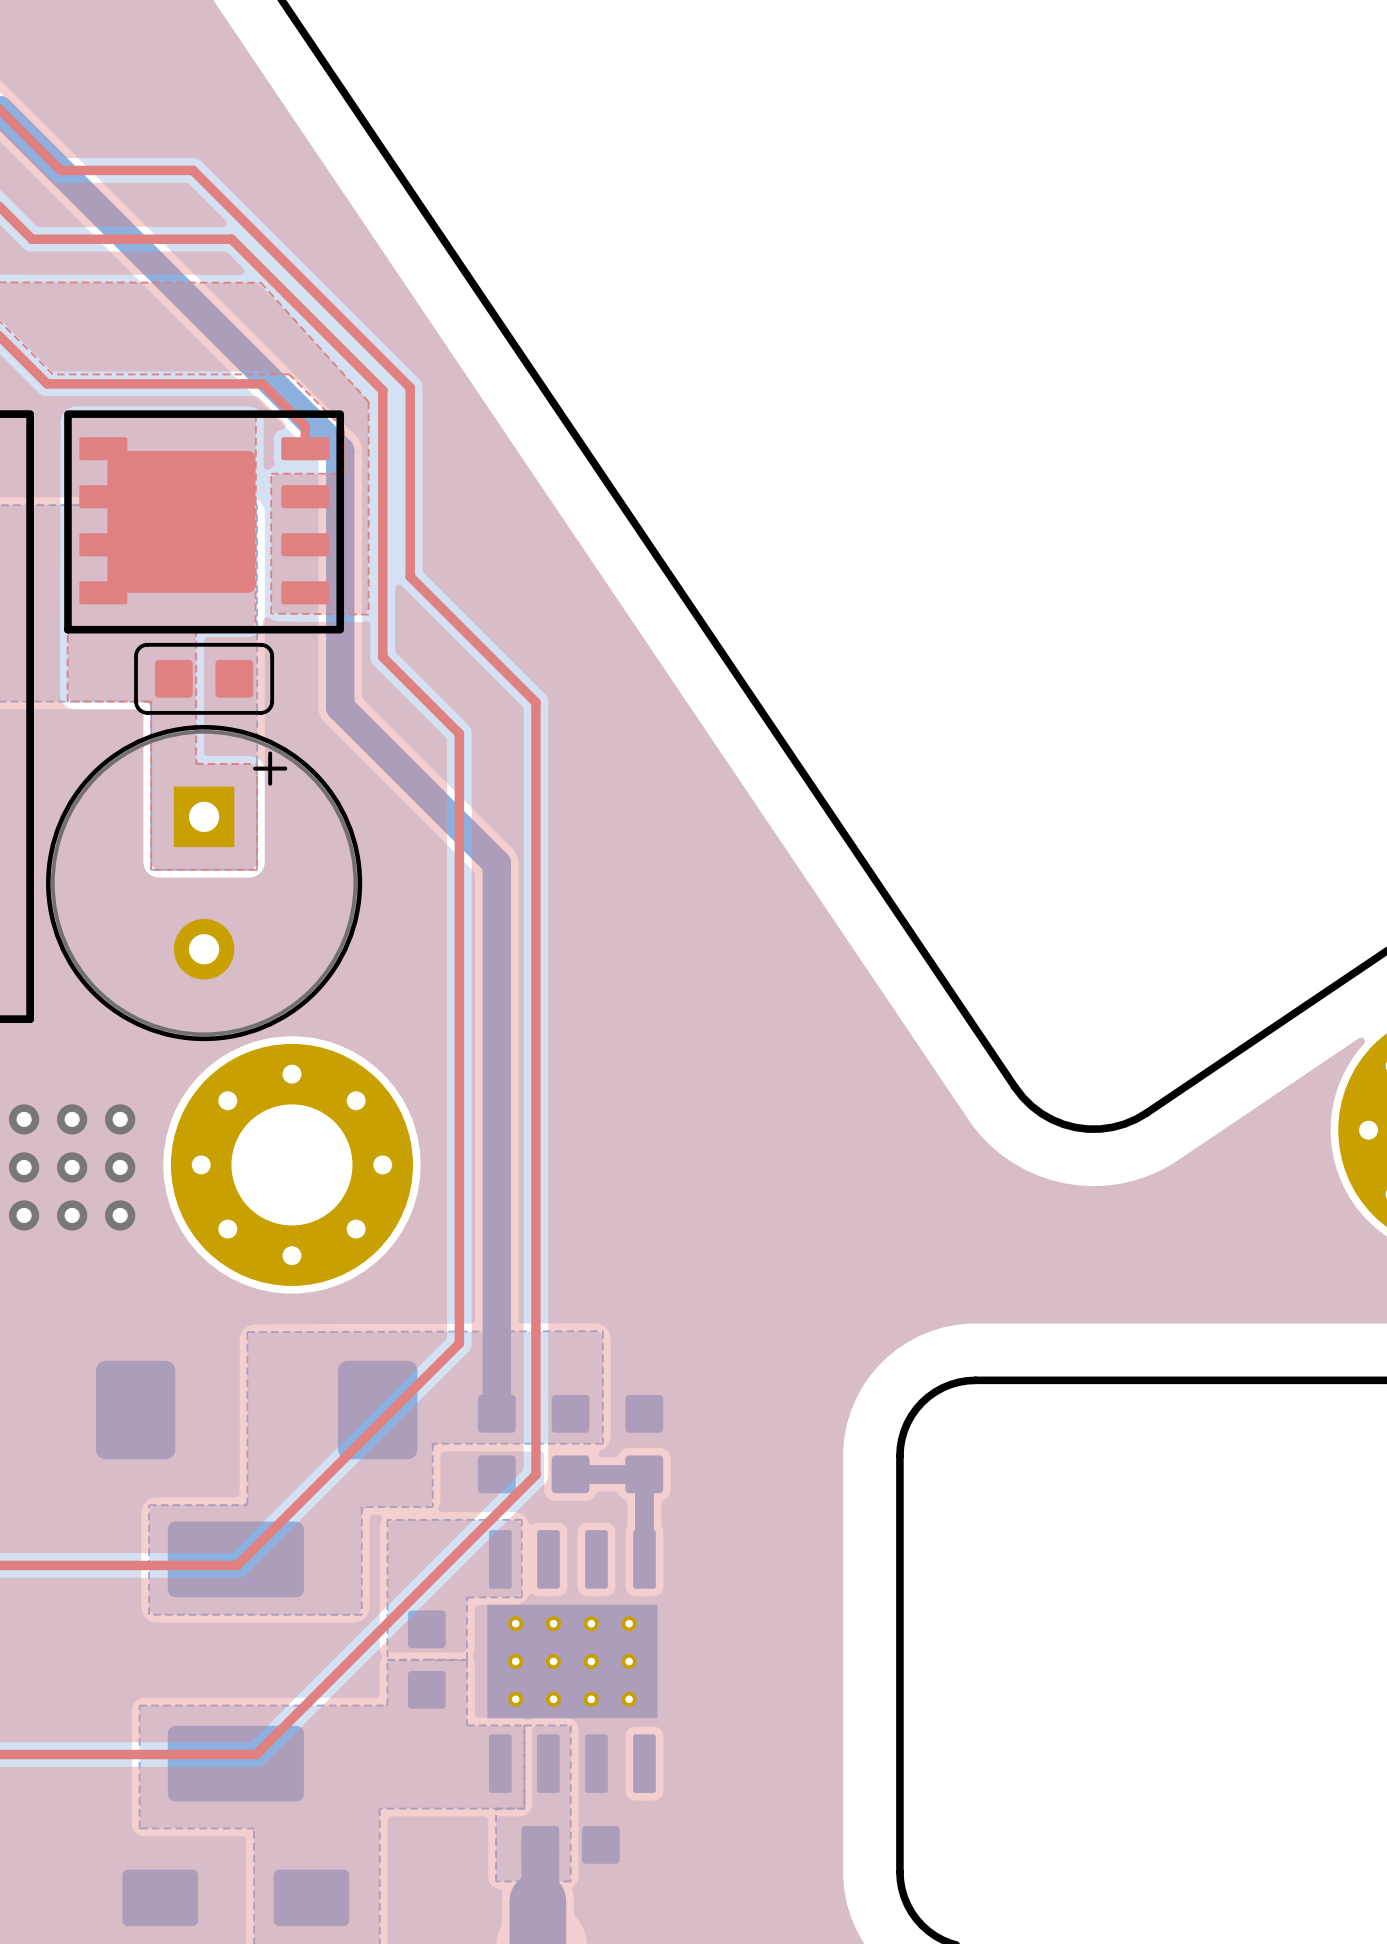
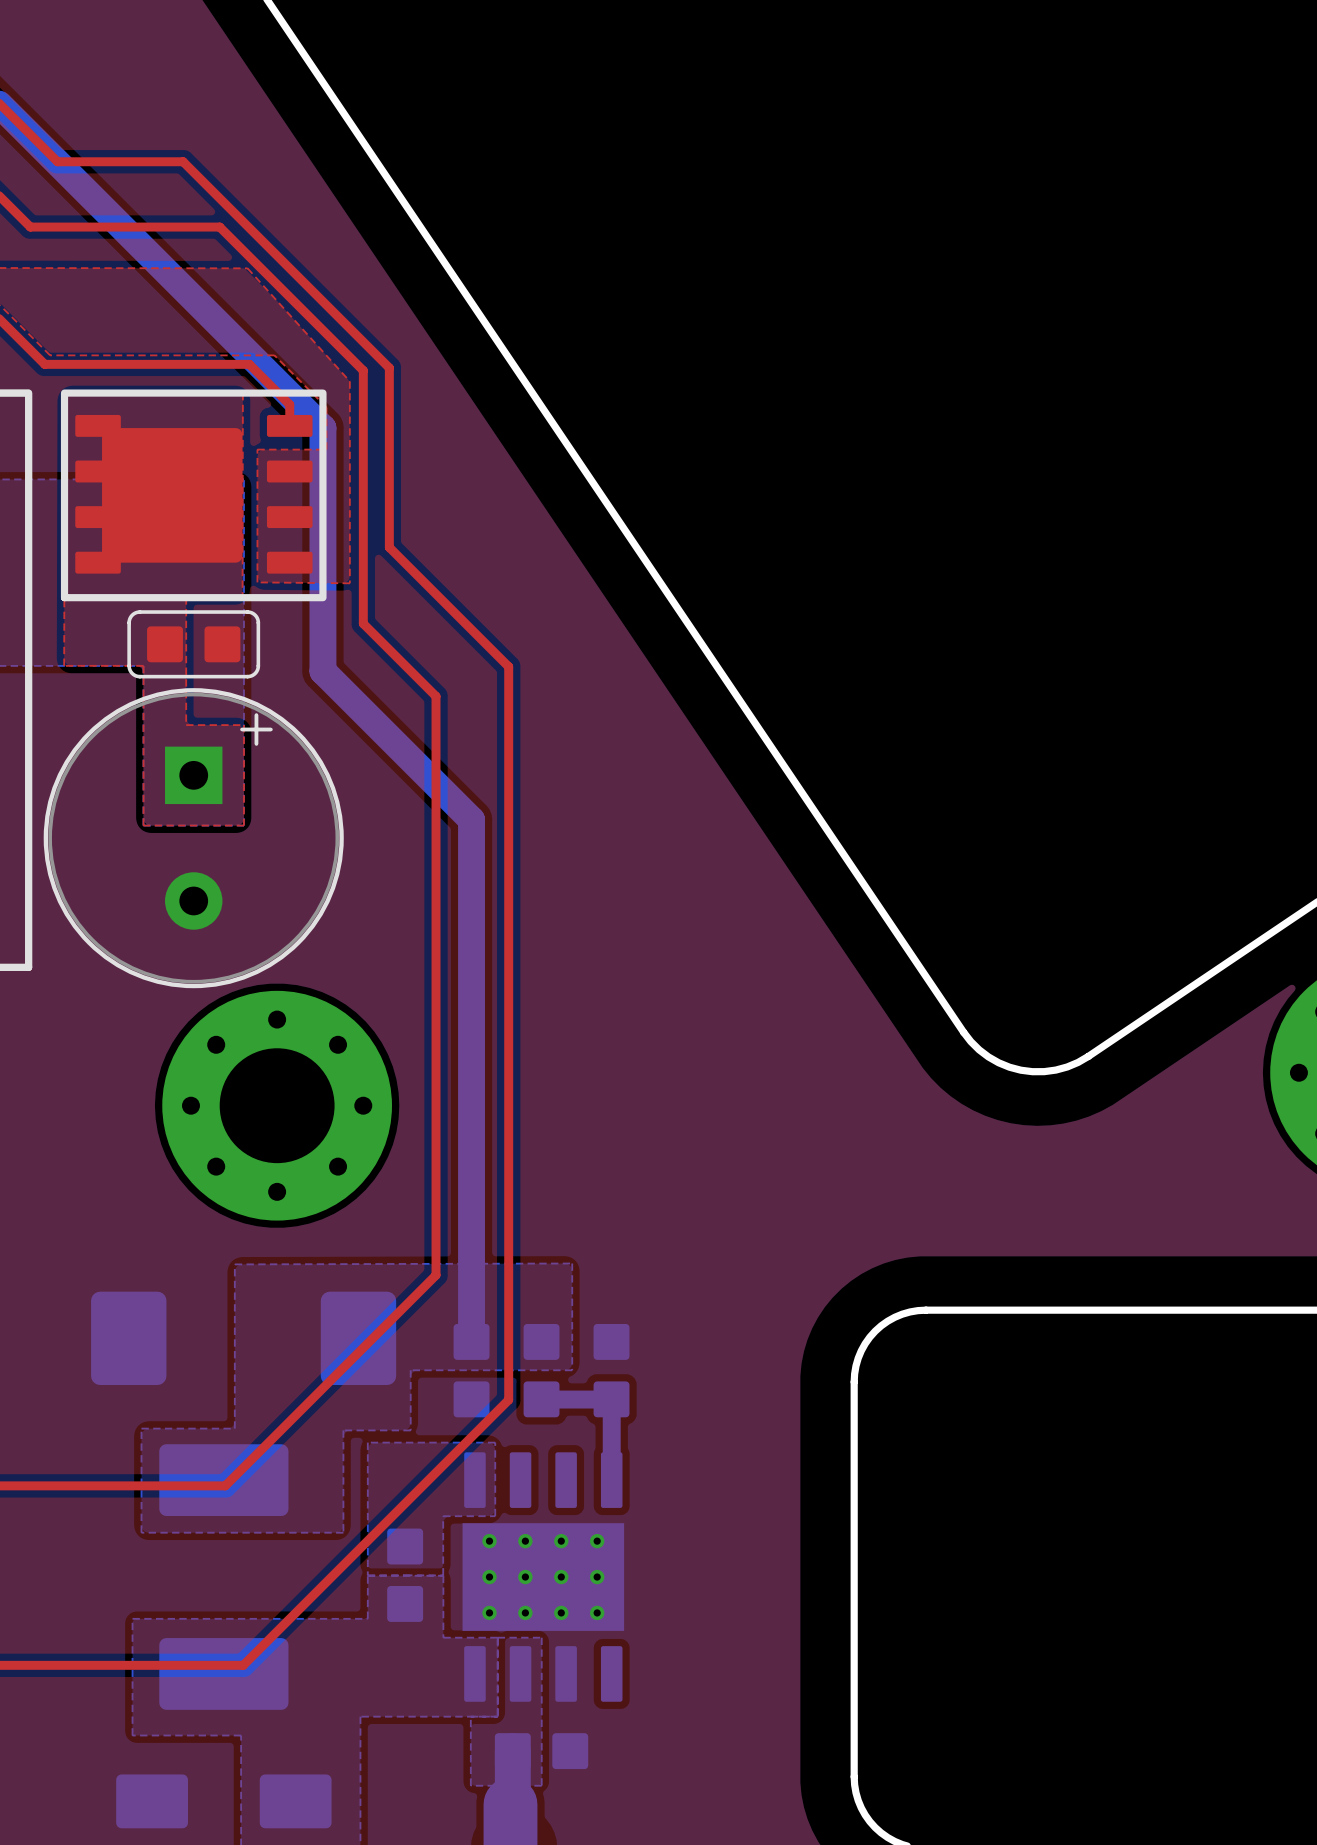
via: (24, 1119) -> none
via: (72, 1119) -> none
via: (120, 1119) -> none
via: (24, 1167) -> none
via: (72, 1167) -> none
via: (120, 1167) -> none
via: (24, 1215) -> none
via: (72, 1215) -> none
via: (120, 1215) -> none

